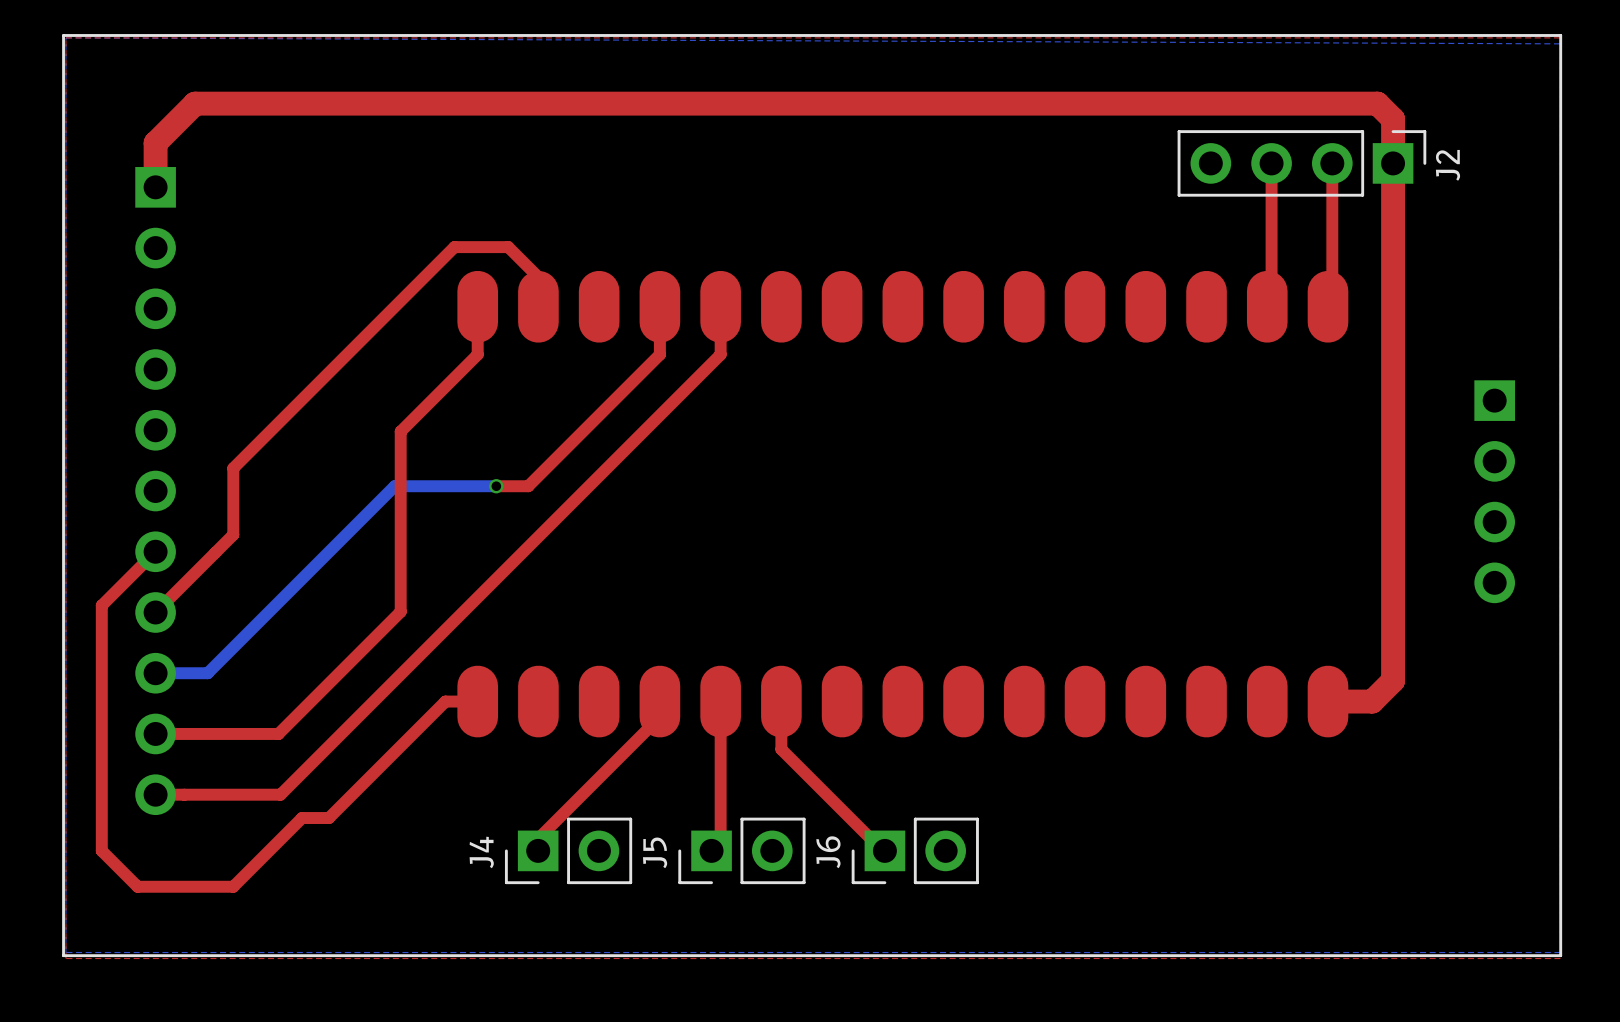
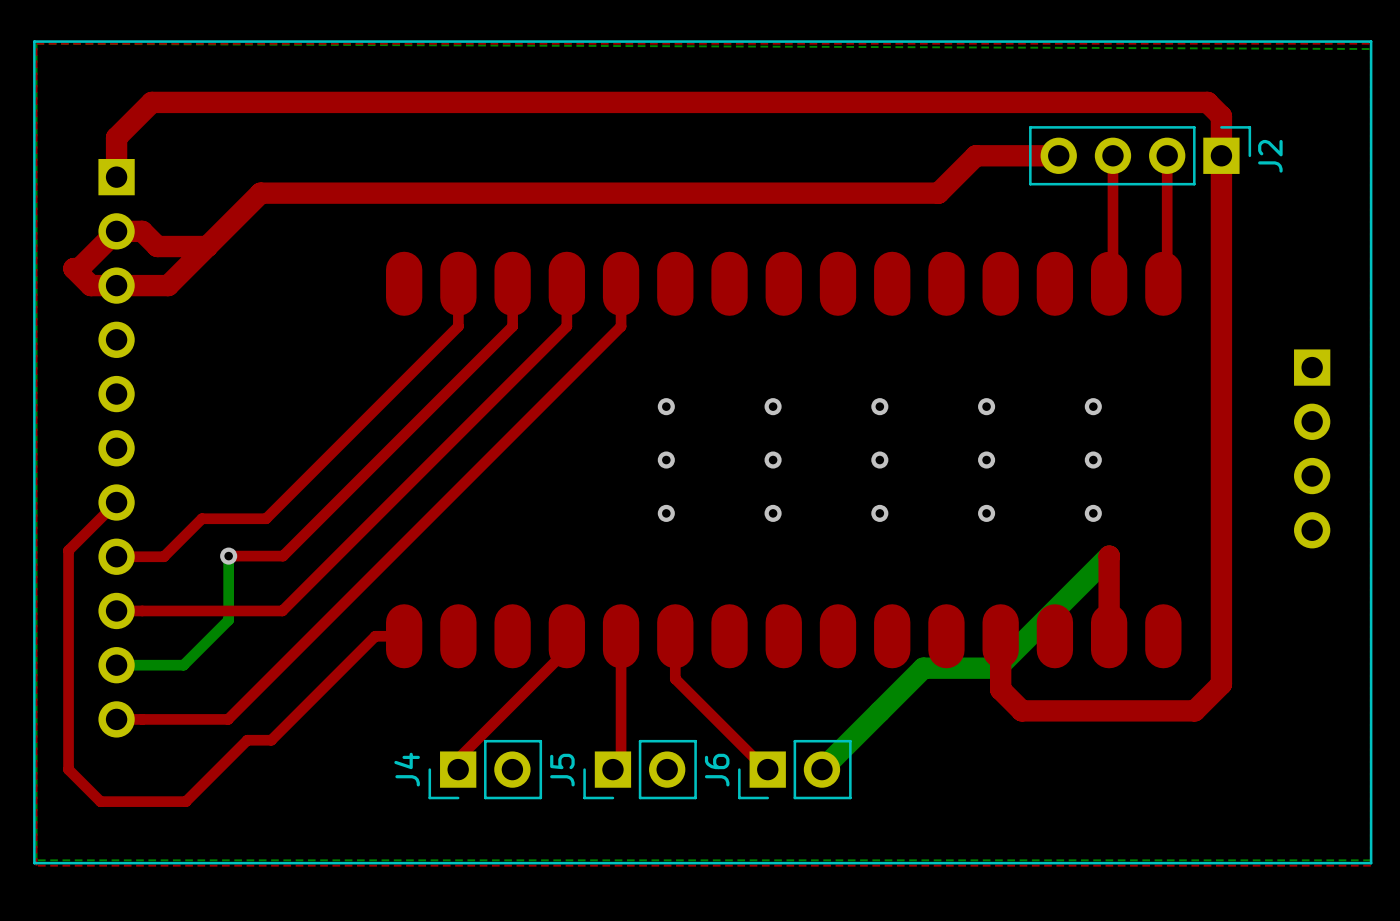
top track: none -> (1058, 155) (975, 155) (938, 193) (260, 193) (168, 285) (90, 285) (73, 268) (79, 268) (116, 231) (142, 231) (157, 246) (207, 246)
top track: (538, 290) (538, 277) (508, 247) (454, 247) (233, 468) (233, 534) (155, 612) -> (458, 283) (458, 326) (266, 518) (201, 518) (163, 556) (116, 556)
top track: (477, 306) (477, 354) (400, 431) (400, 611) (278, 733) (155, 733) -> none
top track: none -> (512, 283) (512, 326) (282, 556) (228, 556)
via: none -> (666, 406)
via: none -> (773, 406)
via: none -> (879, 406)
via: none -> (986, 406)
via: none -> (1093, 406)
top track: (496, 486) (528, 486) -> (116, 610) (282, 610) (449, 444)
bottom track: (496, 486) (394, 486) (207, 673) (155, 673) -> none
via: (496, 486) -> none
via: none -> (666, 460)
via: none -> (773, 460)
via: none -> (879, 460)
via: none -> (986, 460)
via: none -> (1093, 460)
via: none -> (666, 513)
via: none -> (773, 513)
via: none -> (879, 513)
via: none -> (986, 513)
via: none -> (1093, 513)
bottom track: none -> (228, 556) (228, 620) (183, 665) (116, 665)
via: none -> (228, 556)
bottom track: none -> (1109, 556) (997, 668) (923, 668) (821, 769)
top track: none -> (1109, 556) (1109, 636)
top track: (1393, 680) (1372, 701) (1328, 701) -> (1221, 617) (1221, 684) (1194, 710) (1021, 710) (1000, 689) (1000, 636)

